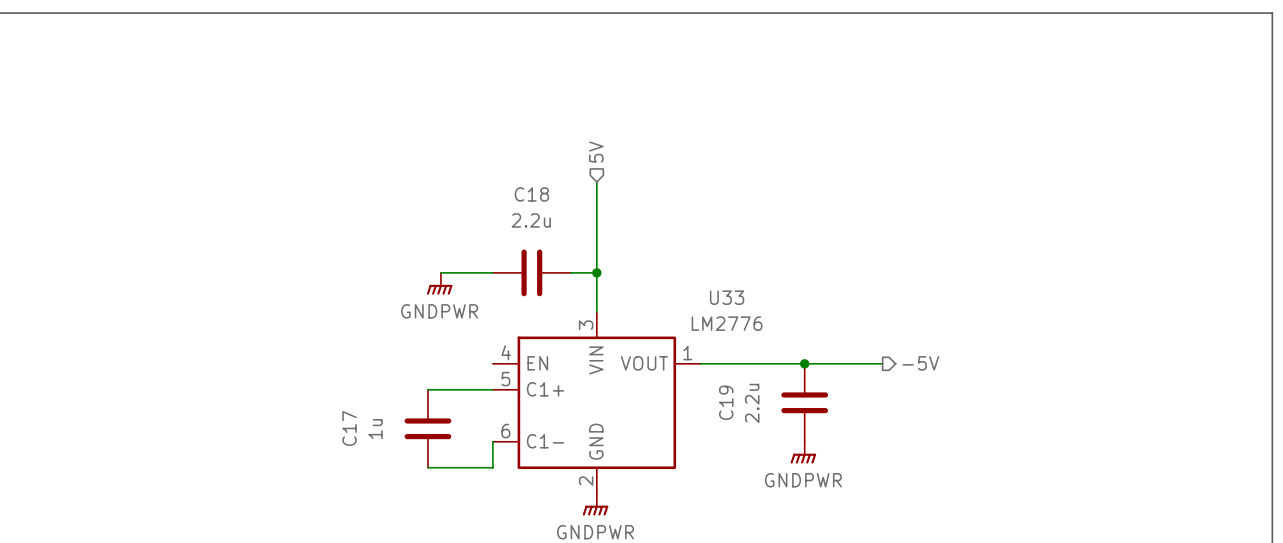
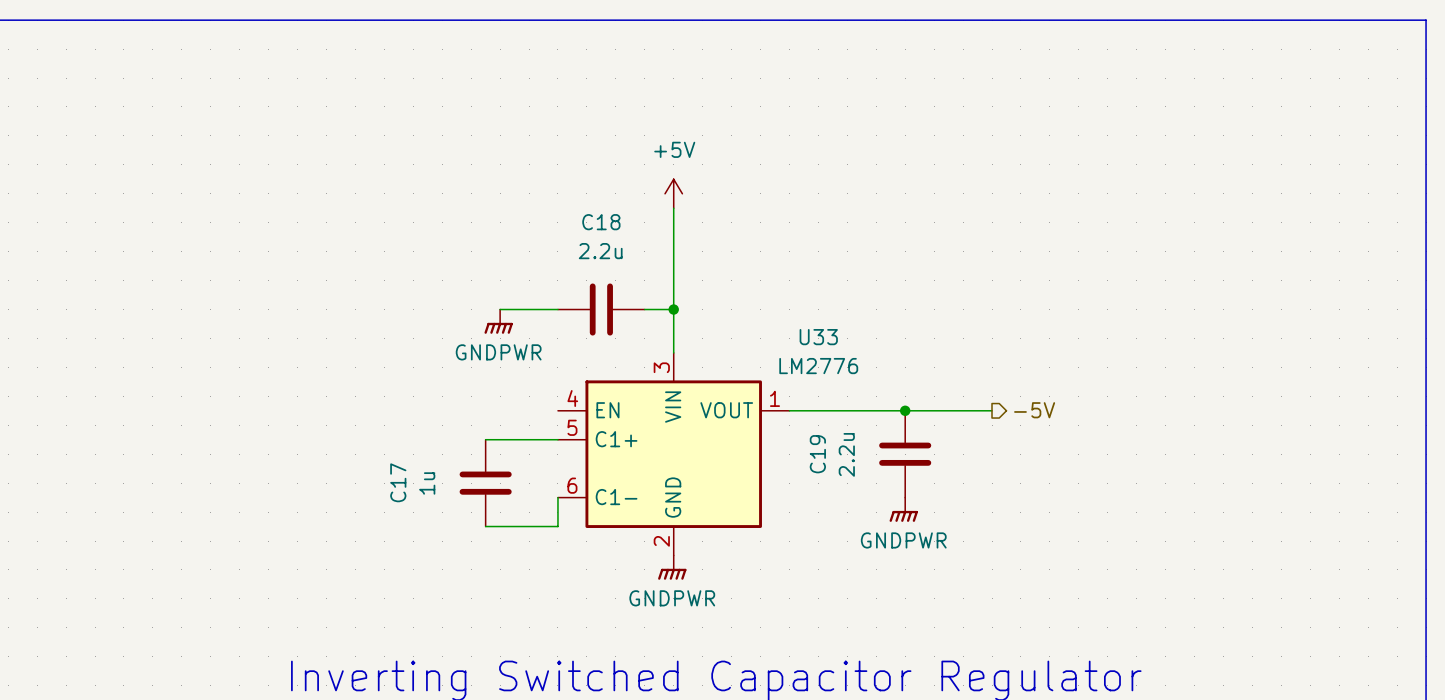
hierarchical label: 5V (596, 152) -> none
power symbol: none -> +5V (673, 193)

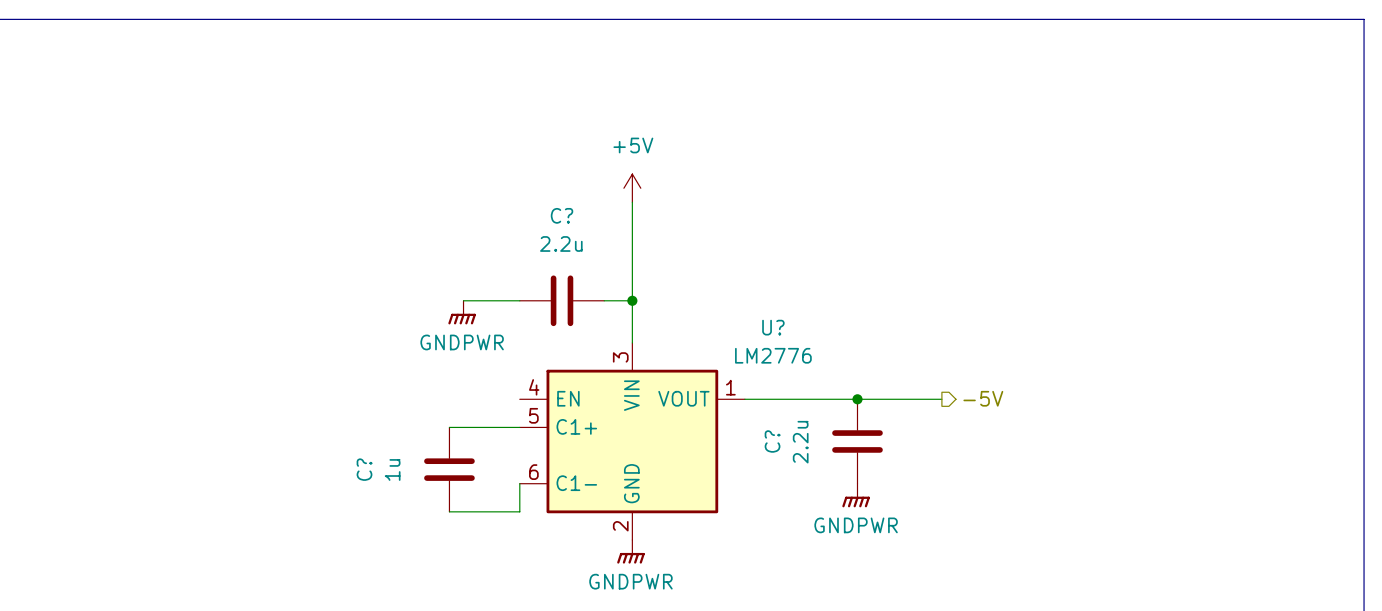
C18 name: C18 (601, 222) -> C? (562, 215)
U33 name: U33 (818, 337) -> U? (773, 327)
C19 name: C19 (817, 454) -> C? (772, 441)
C17 name: C17 (398, 482) -> C? (364, 469)

